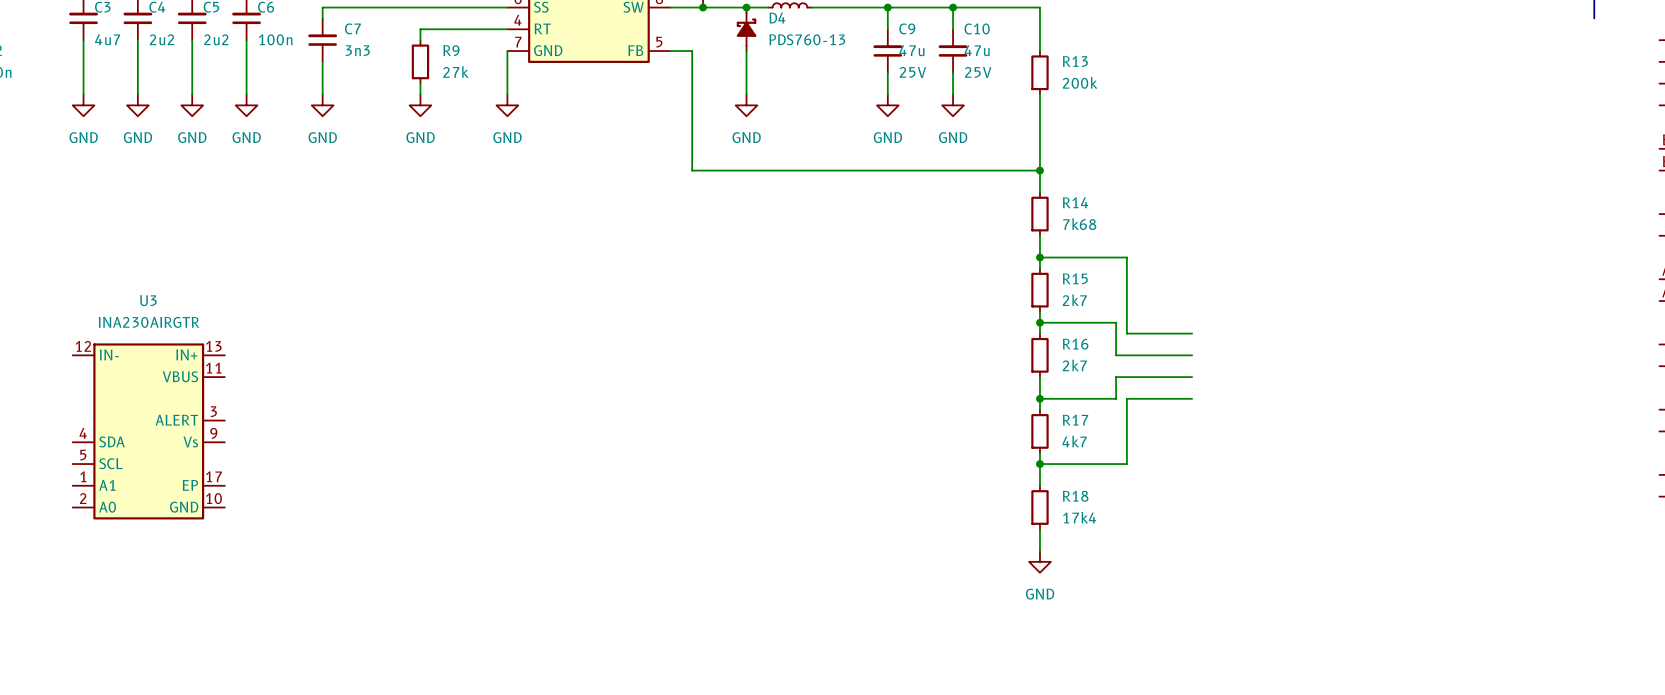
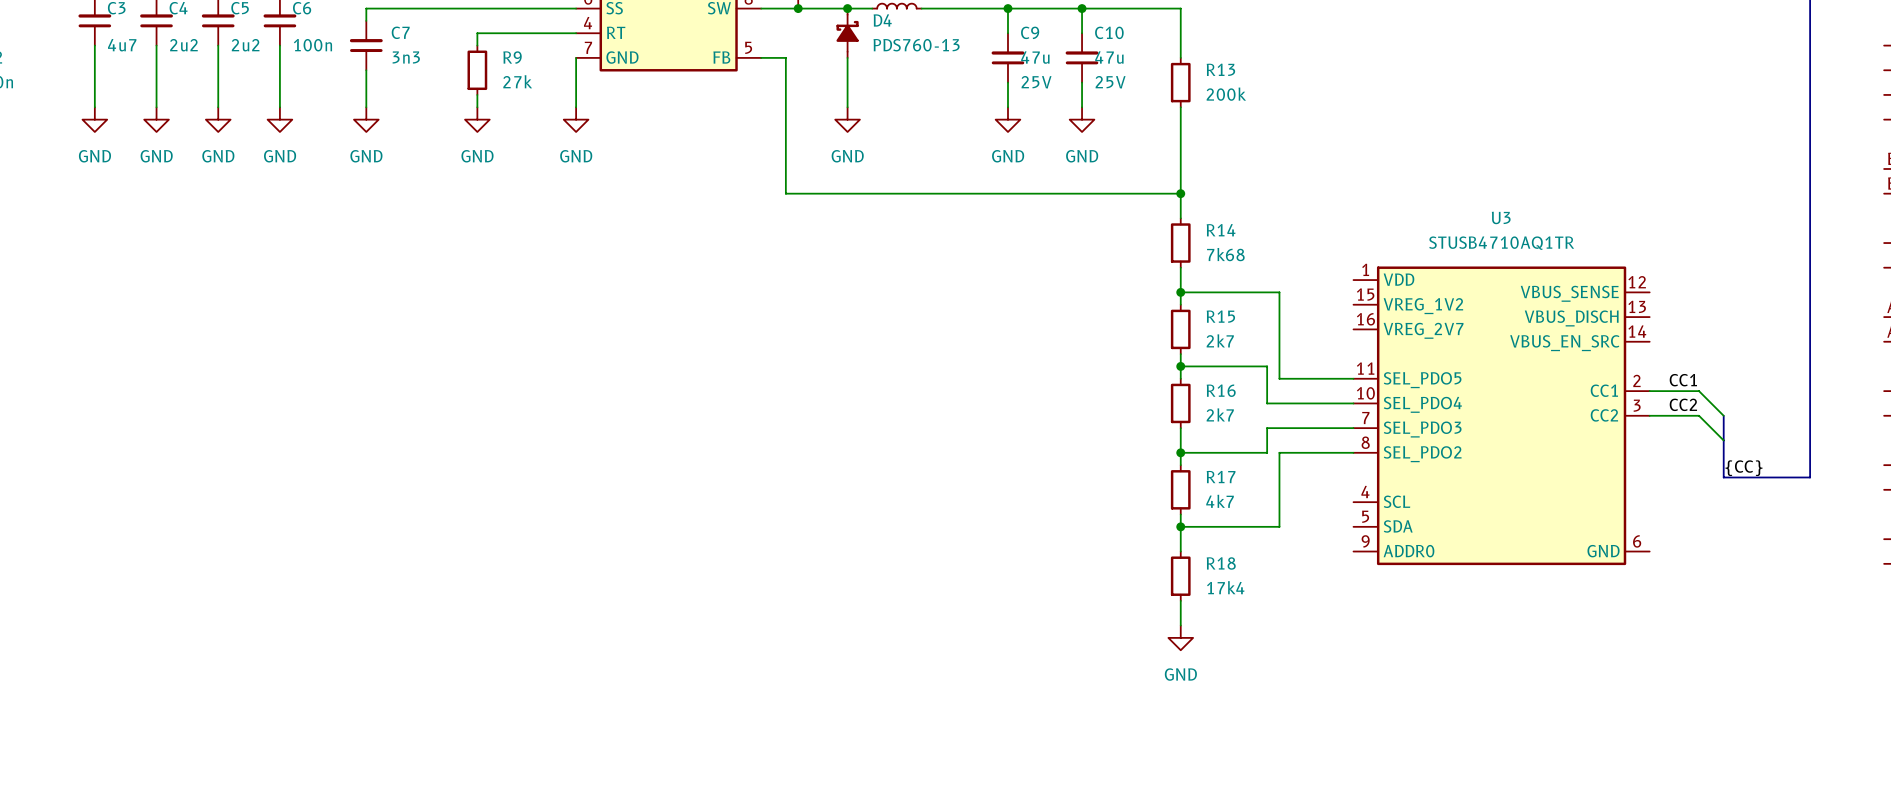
bus: none -> (1810, 20) (1810, 477) (1723, 477) (1723, 415)
U3 text: none -> STUSB4710AQ1TR (1501, 243)
U3 name position: U3 (148, 300) -> U3 (1501, 217)
U3 value: INA230AIRGTR (149, 322) -> none
label: none -> CC1 (1683, 380)
U3 symbol: [72, 343, 225, 520] -> [1353, 266, 1650, 566]
wire: none -> (1649, 391) (1699, 391) (1723, 415)
label: none -> CC2 (1683, 404)
wire: none -> (1649, 415) (1699, 415) (1723, 440)
label: none -> {CC} (1744, 468)

